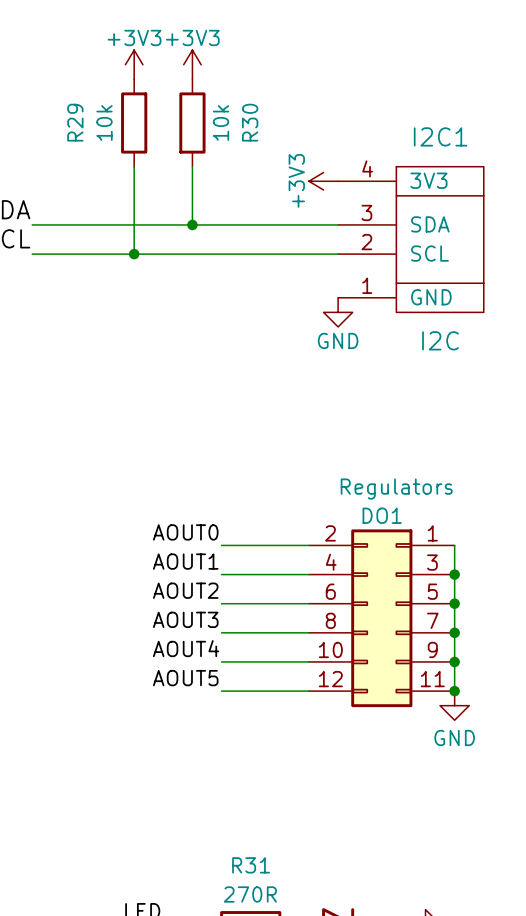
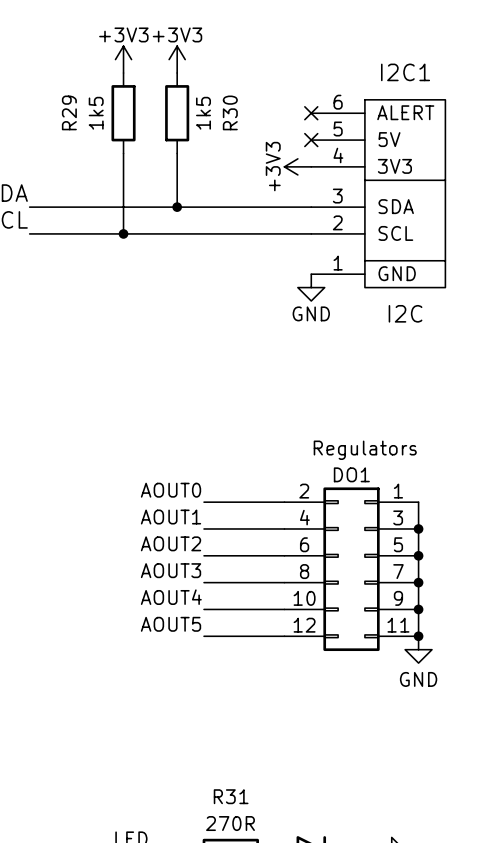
R29 value: 10k (104, 123) -> 1k5 (96, 113)
R30 value: 10k (221, 123) -> 1k5 (203, 113)
no-connect mark: none -> (311, 113)
I2C1 name position: I2C1 (440, 136) -> I2C1 (405, 72)
no-connect mark: none -> (311, 140)
I2C1 symbol: [338, 166, 484, 313] -> [311, 99, 446, 288]

